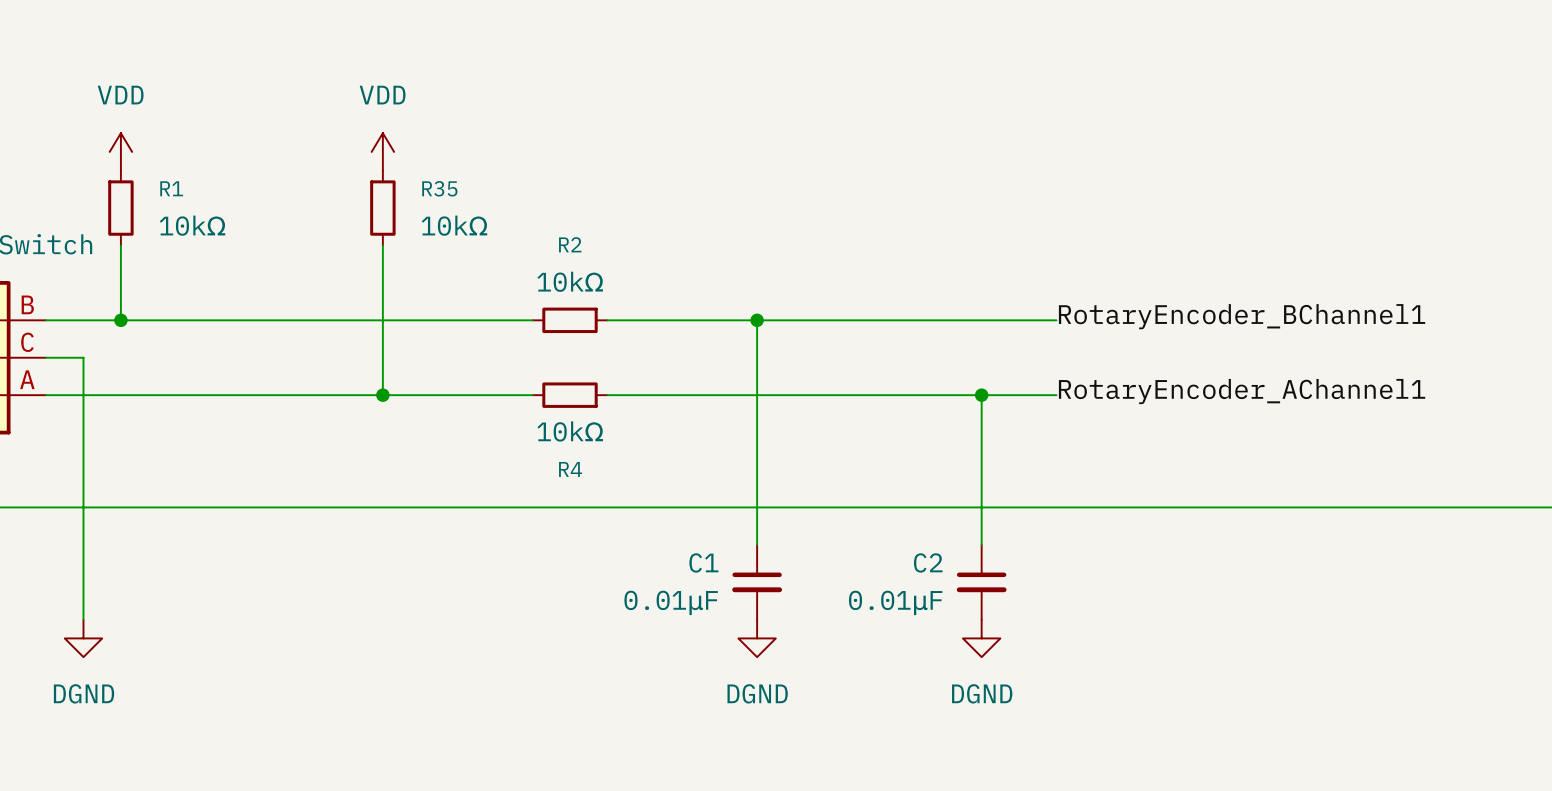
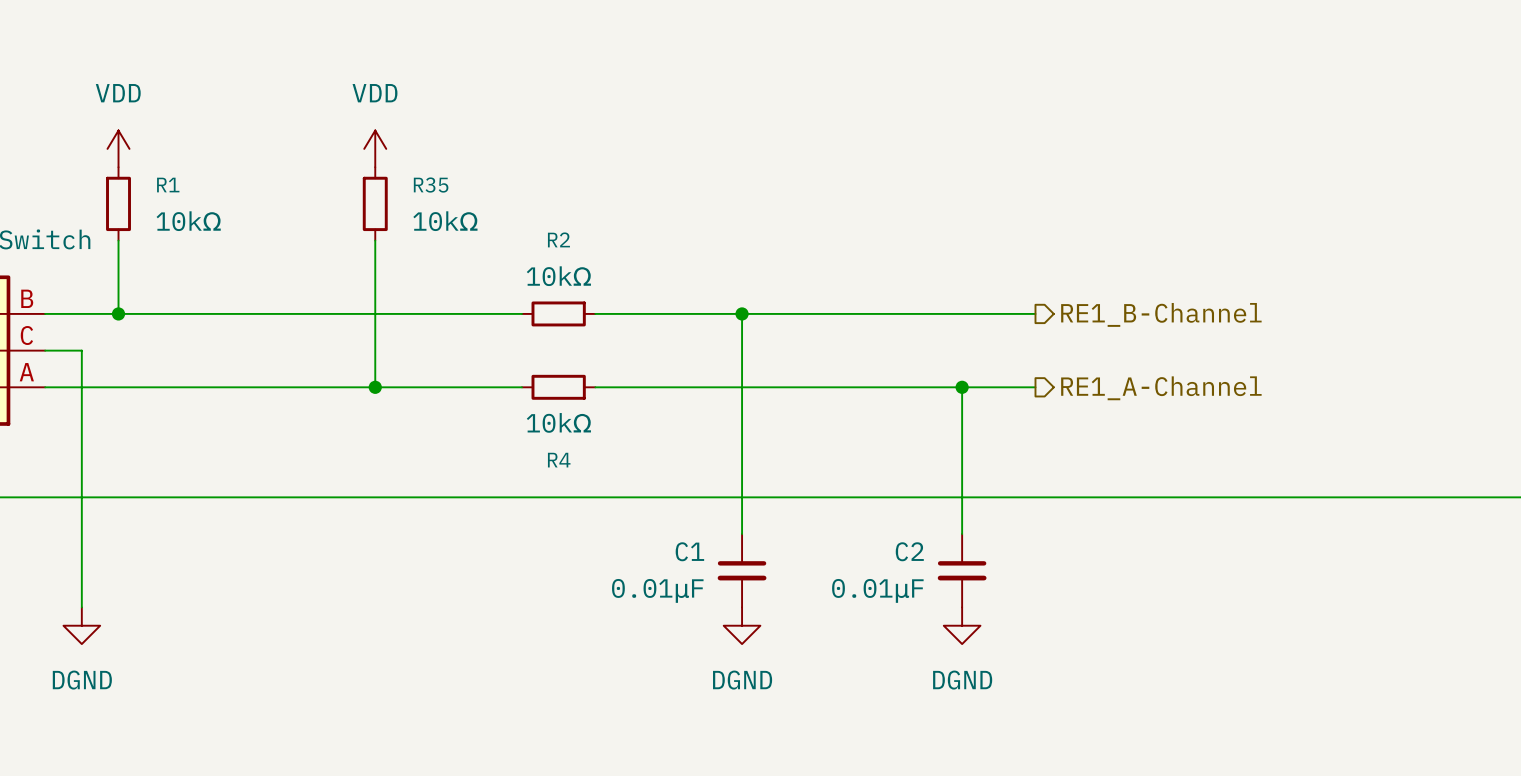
label: RotaryEncoder_BChannel1 (1242, 316) -> none
hierarchical label: none -> RE1_B-Channel (1161, 314)
label: RotaryEncoder_AChannel1 (1242, 391) -> none
hierarchical label: none -> RE1_A-Channel (1161, 388)

